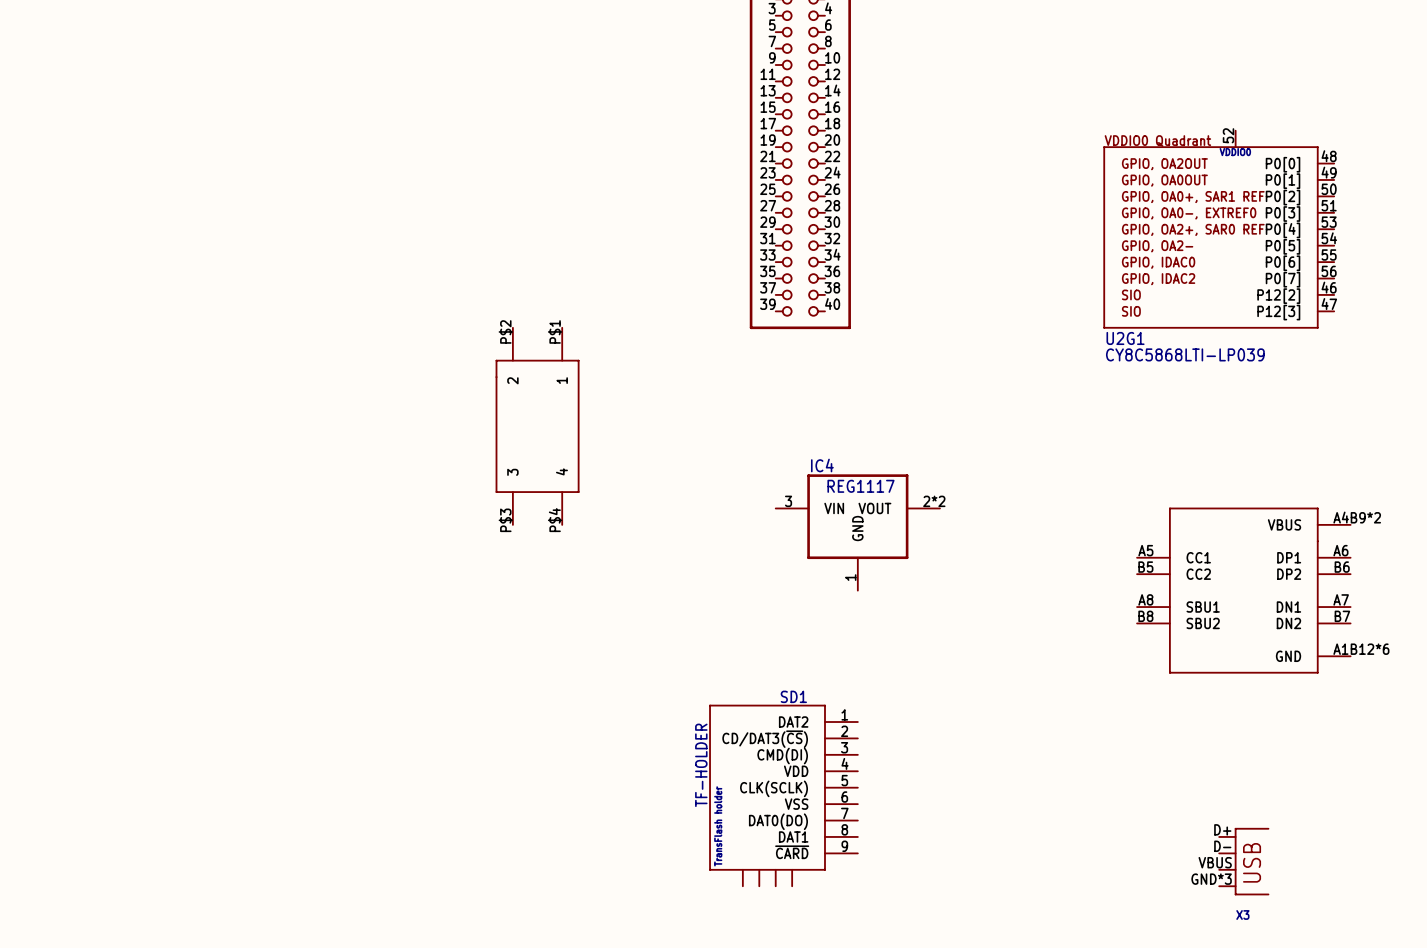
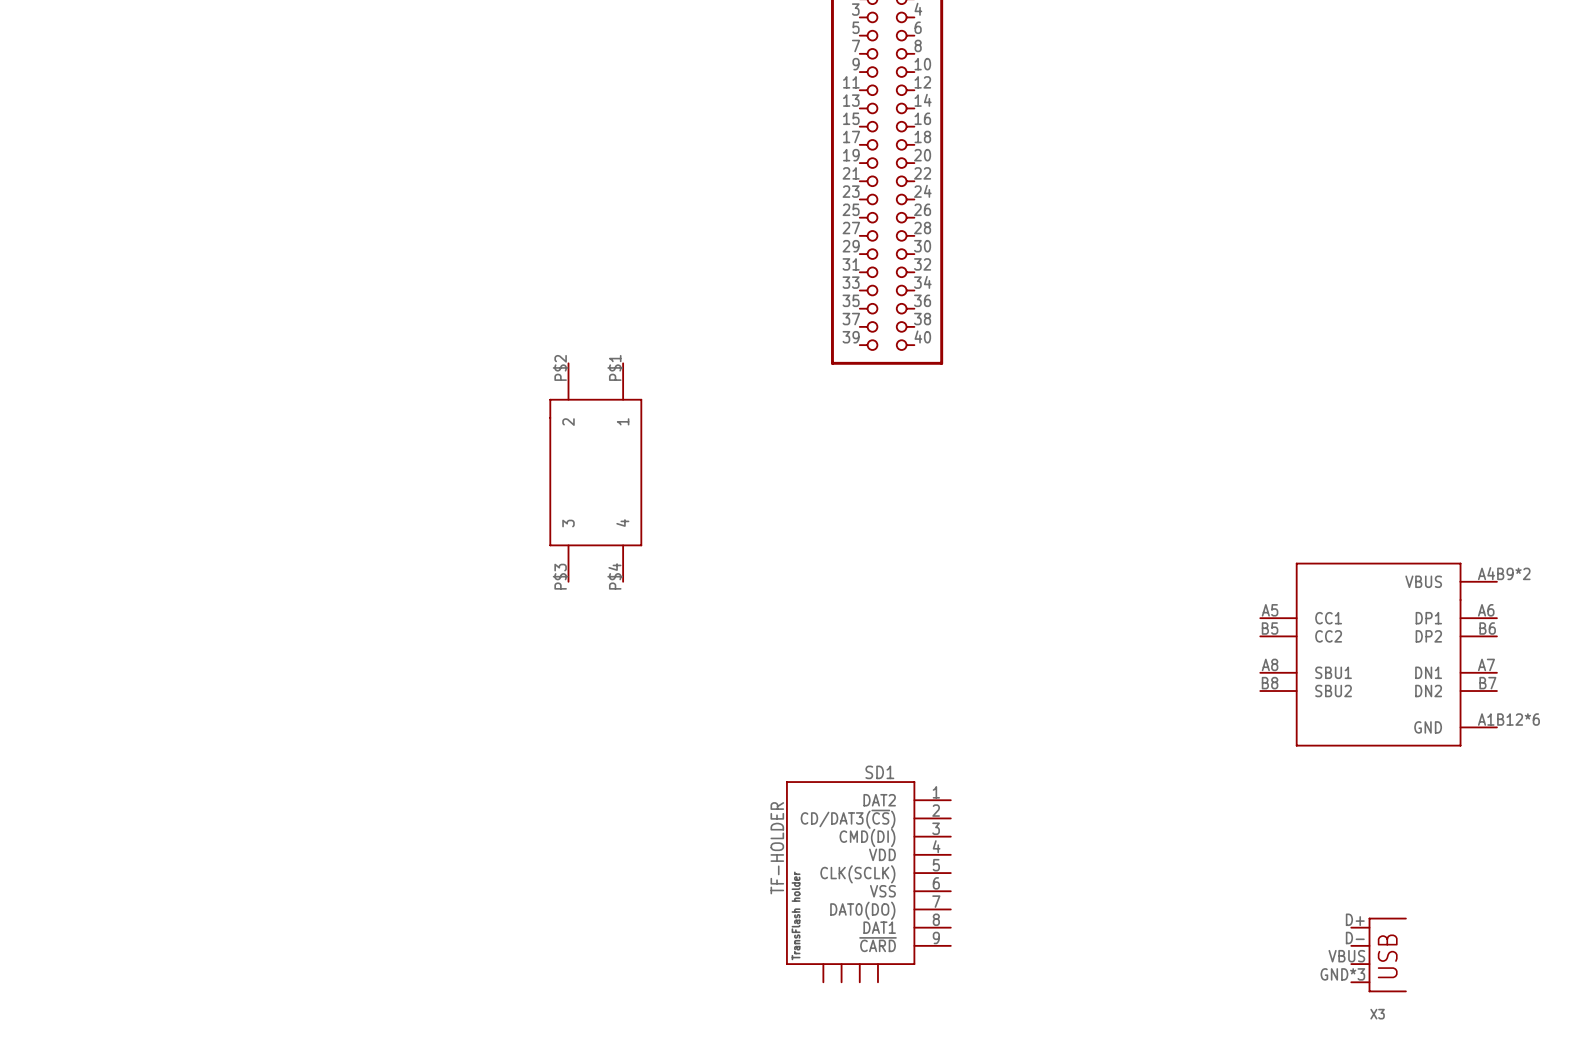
U2G1: CY8C5868LTI-LP039 (1218, 229) -> none
IC4: REG1117 (857, 532) -> none

